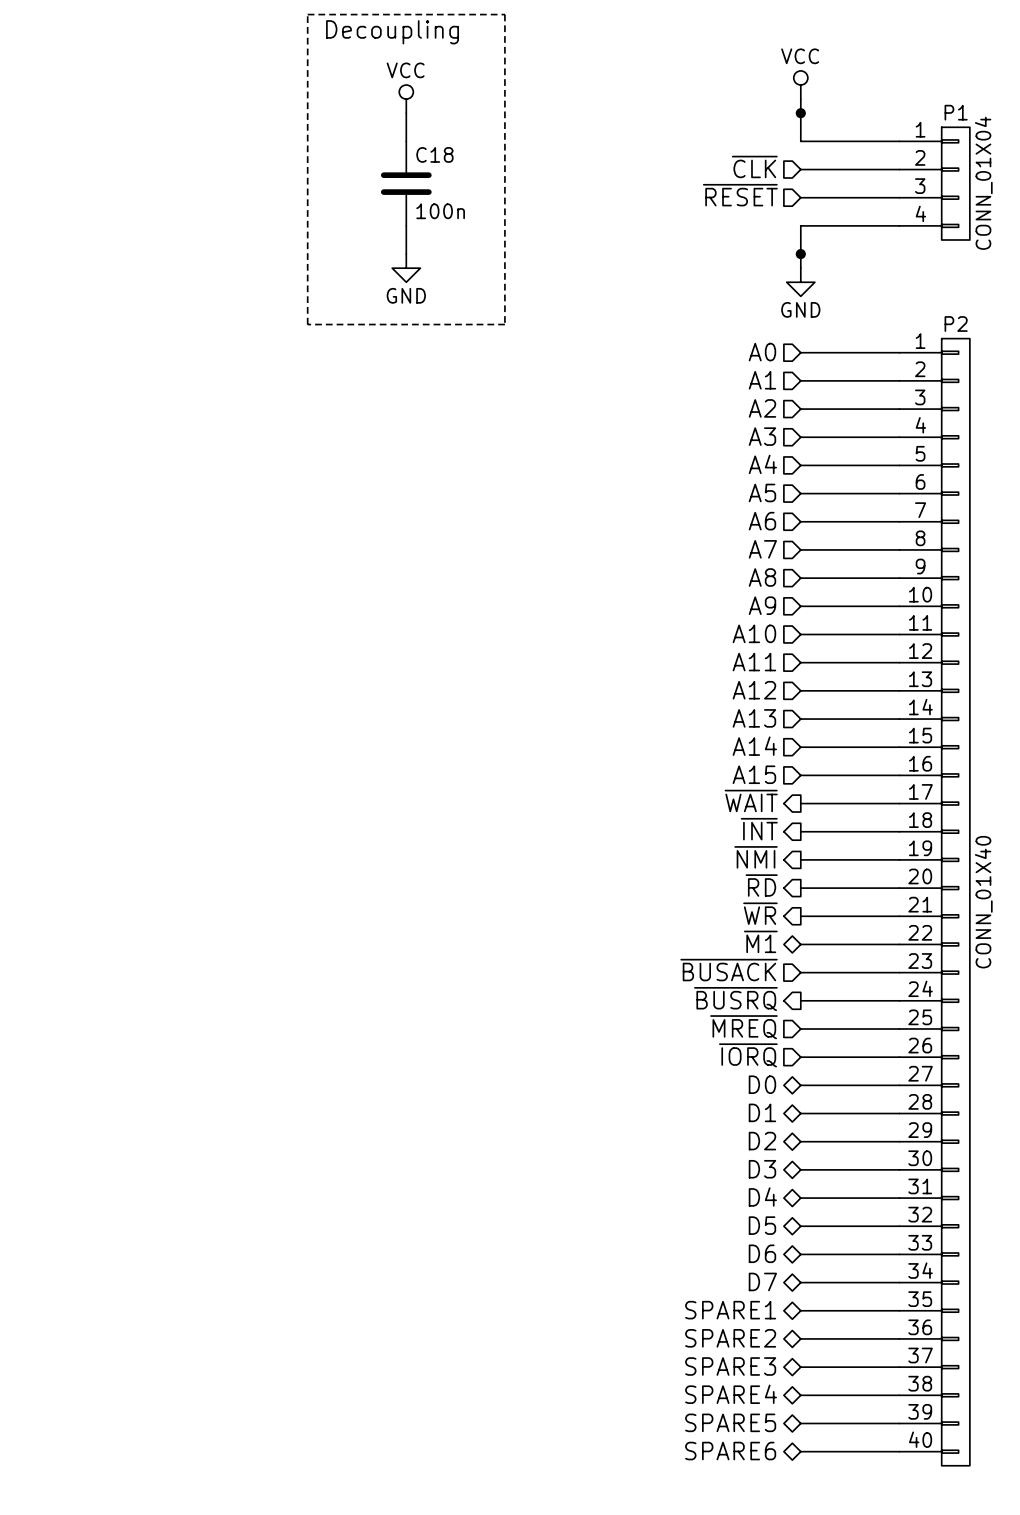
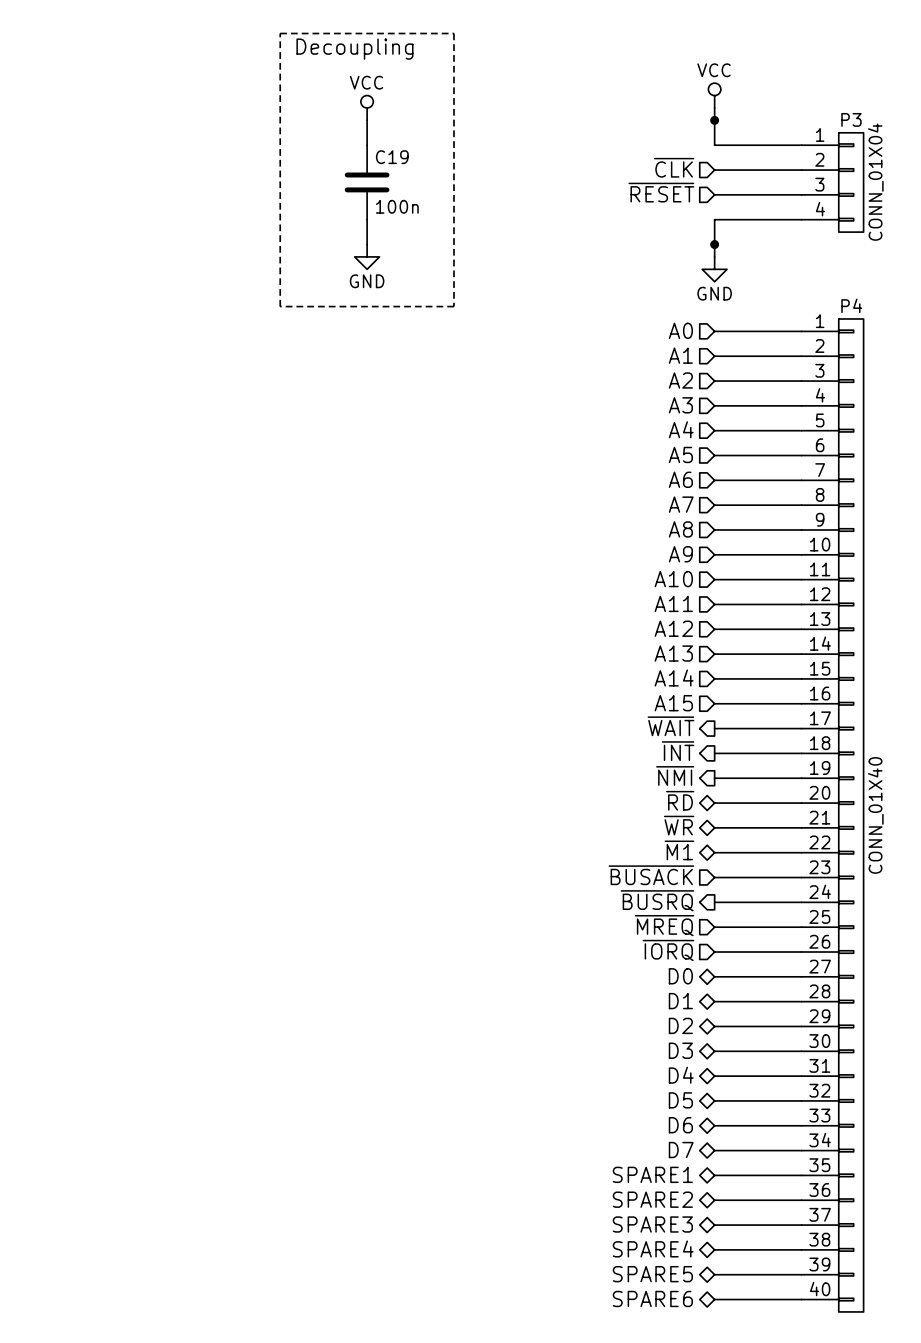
P1 name: P1 (956, 112) -> P3 (851, 119)
C18 name: C18 (434, 154) -> C19 (392, 157)
P2 name: P2 (956, 324) -> P4 (851, 305)
hierarchical label shape: output (761, 885) -> bidirectional (680, 800)
hierarchical label shape: output (760, 913) -> bidirectional (679, 825)

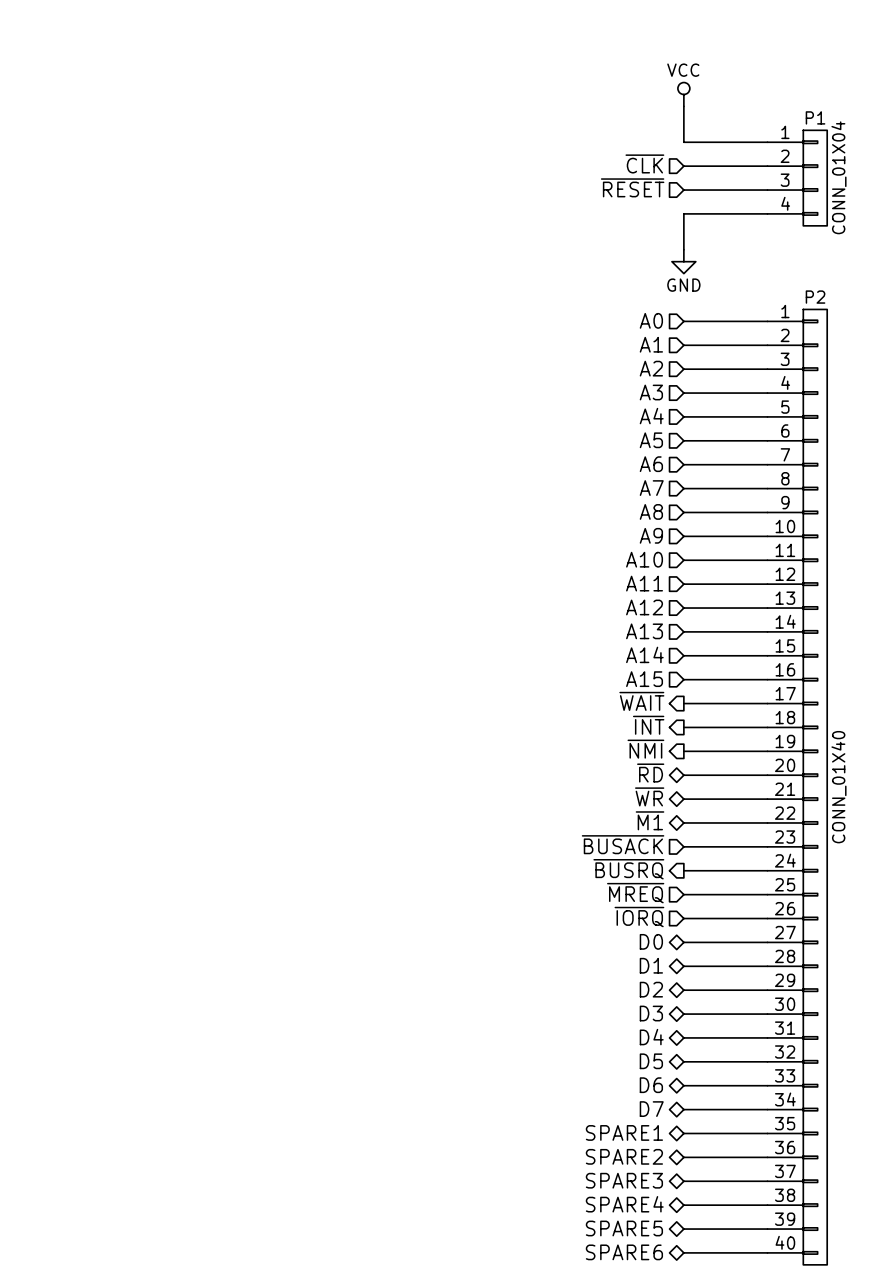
line: (280, 33) (453, 33) (453, 306) (280, 306) (280, 33) -> none
text: Decoupling (354, 49) -> none
power symbol: VCC (367, 107) -> none
P3 name: P3 (851, 119) -> P1 (815, 117)
wire: (367, 120) (367, 145) -> none
junction: (714, 120) -> none
C19: 100n (367, 182) -> none
wire: (367, 219) (367, 244) -> none
junction: (714, 244) -> none
power symbol: GND (367, 256) -> none
P4 name: P4 (851, 305) -> P2 (815, 297)

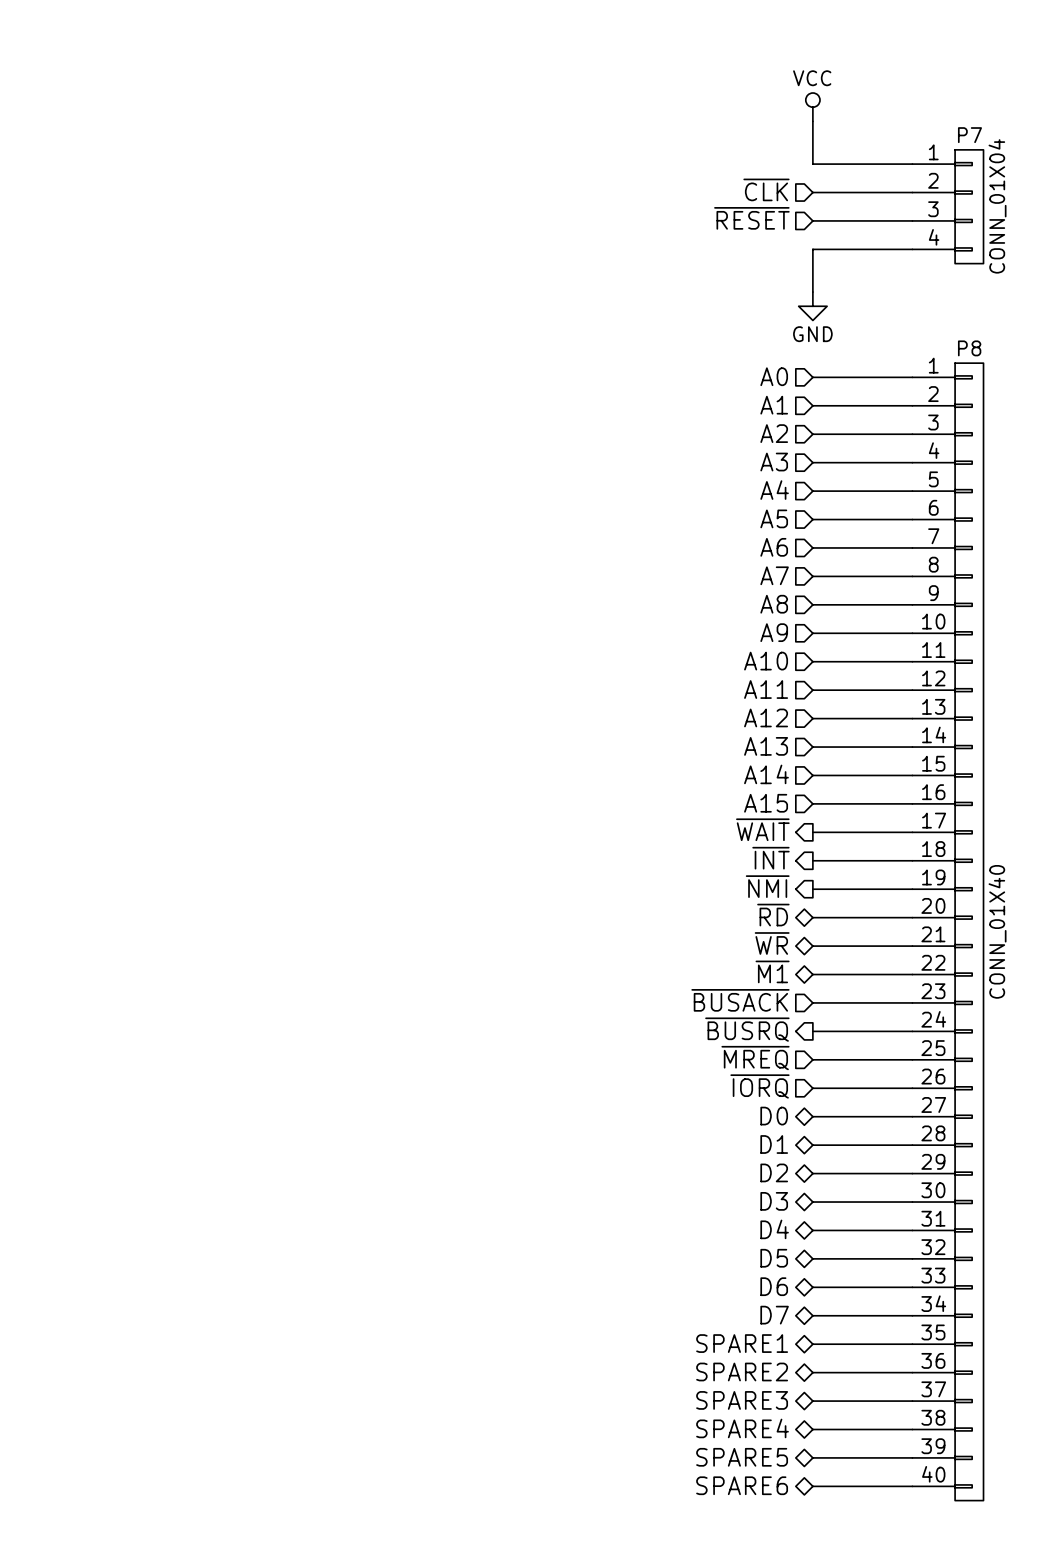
P1 name: P1 (815, 117) -> P7 (969, 135)
P2 name: P2 (815, 297) -> P8 (969, 348)

